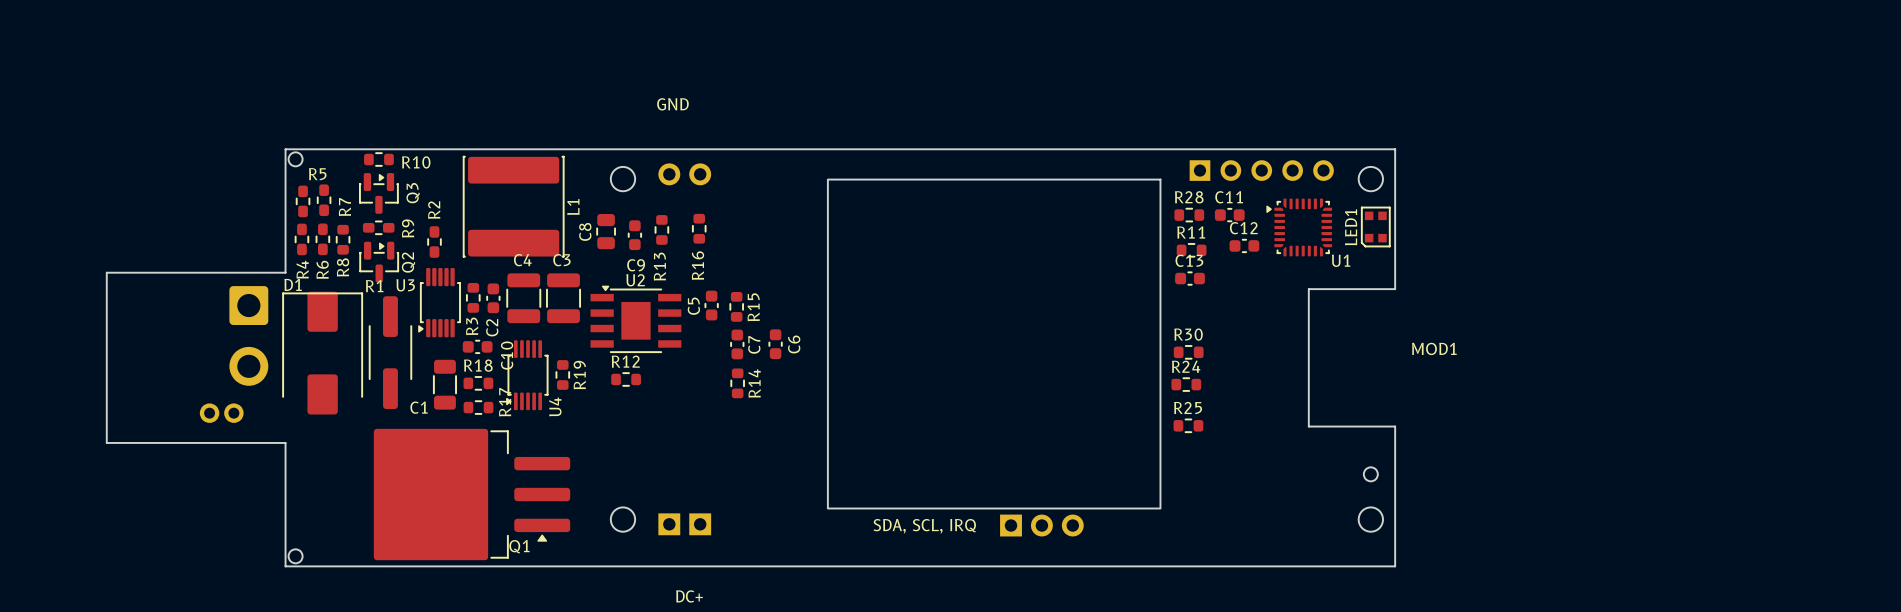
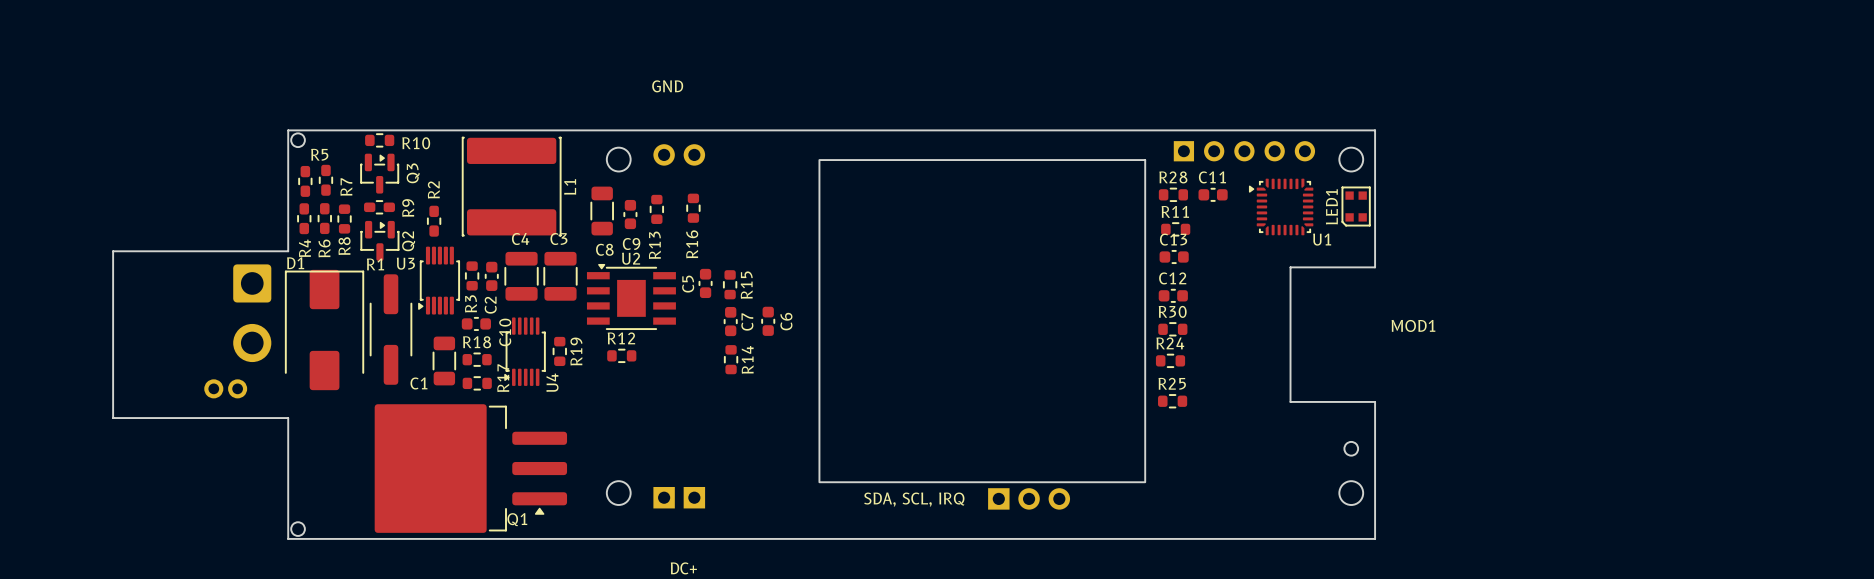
C8 footprint: [596, 213, 616, 250] -> [590, 186, 614, 236]
C8 name rotation: 0° (585, 231) -> 90° clockwise (604, 249)
C8 name position: C8 (585, 231) -> C8 (604, 249)
C12 position: (1244, 245) -> (1173, 295)

